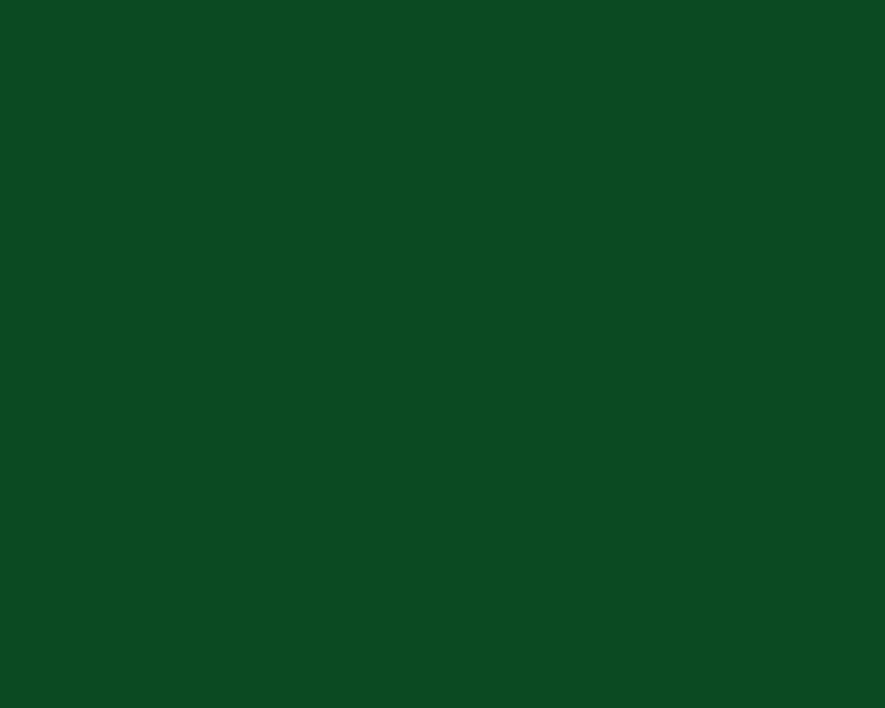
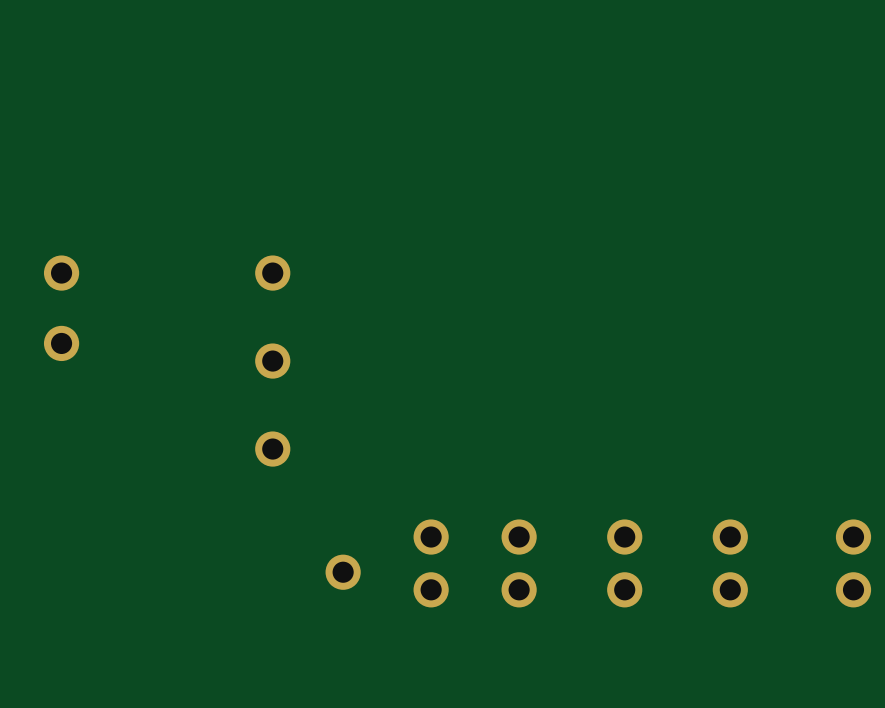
via: none -> (61, 273)
via: none -> (272, 273)
via: none -> (61, 343)
via: none -> (272, 361)
via: none -> (272, 449)
via: none -> (431, 537)
via: none -> (519, 537)
via: none -> (624, 537)
via: none -> (730, 537)
via: none -> (853, 537)
via: none -> (343, 572)
via: none -> (431, 589)
via: none -> (519, 589)
via: none -> (624, 589)
via: none -> (730, 589)
via: none -> (853, 589)

